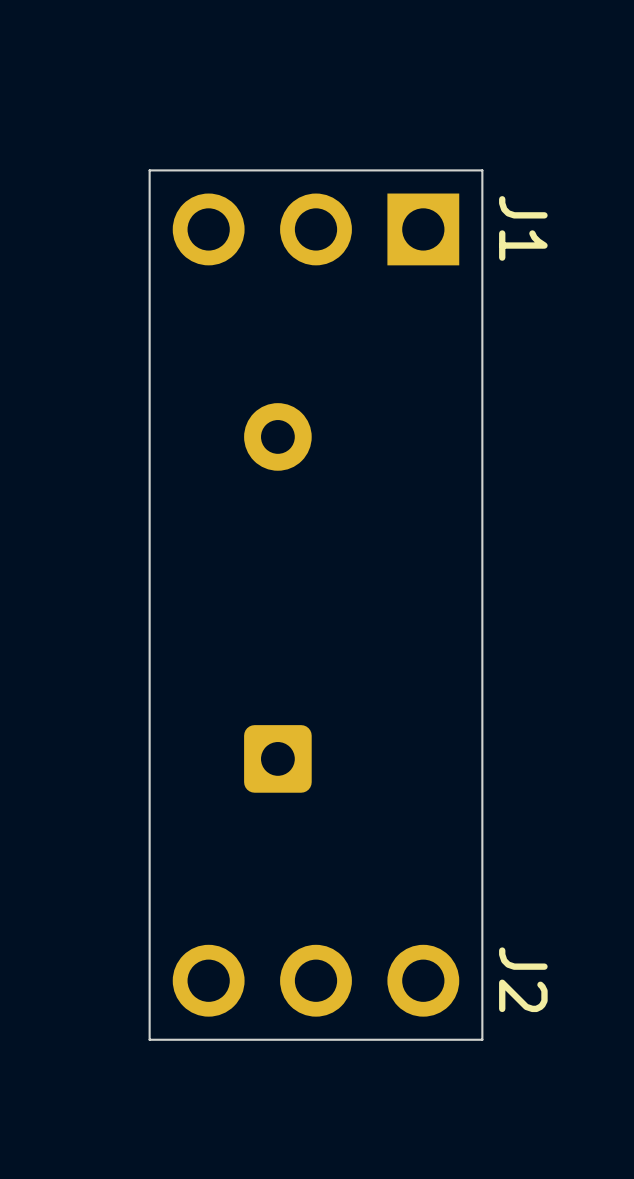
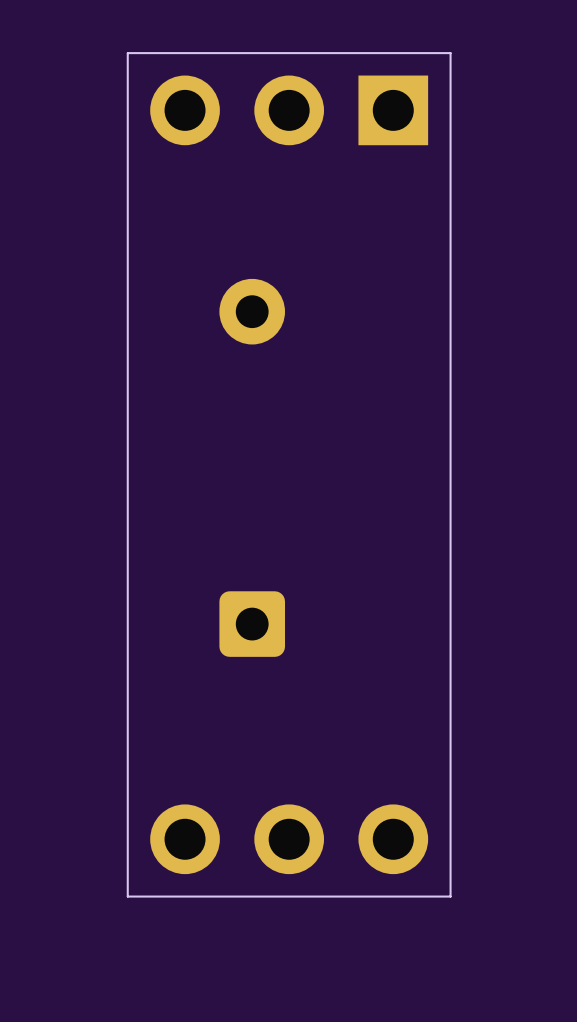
J1 name: J1 (523, 228) -> none
J2 name: J2 (523, 979) -> none

